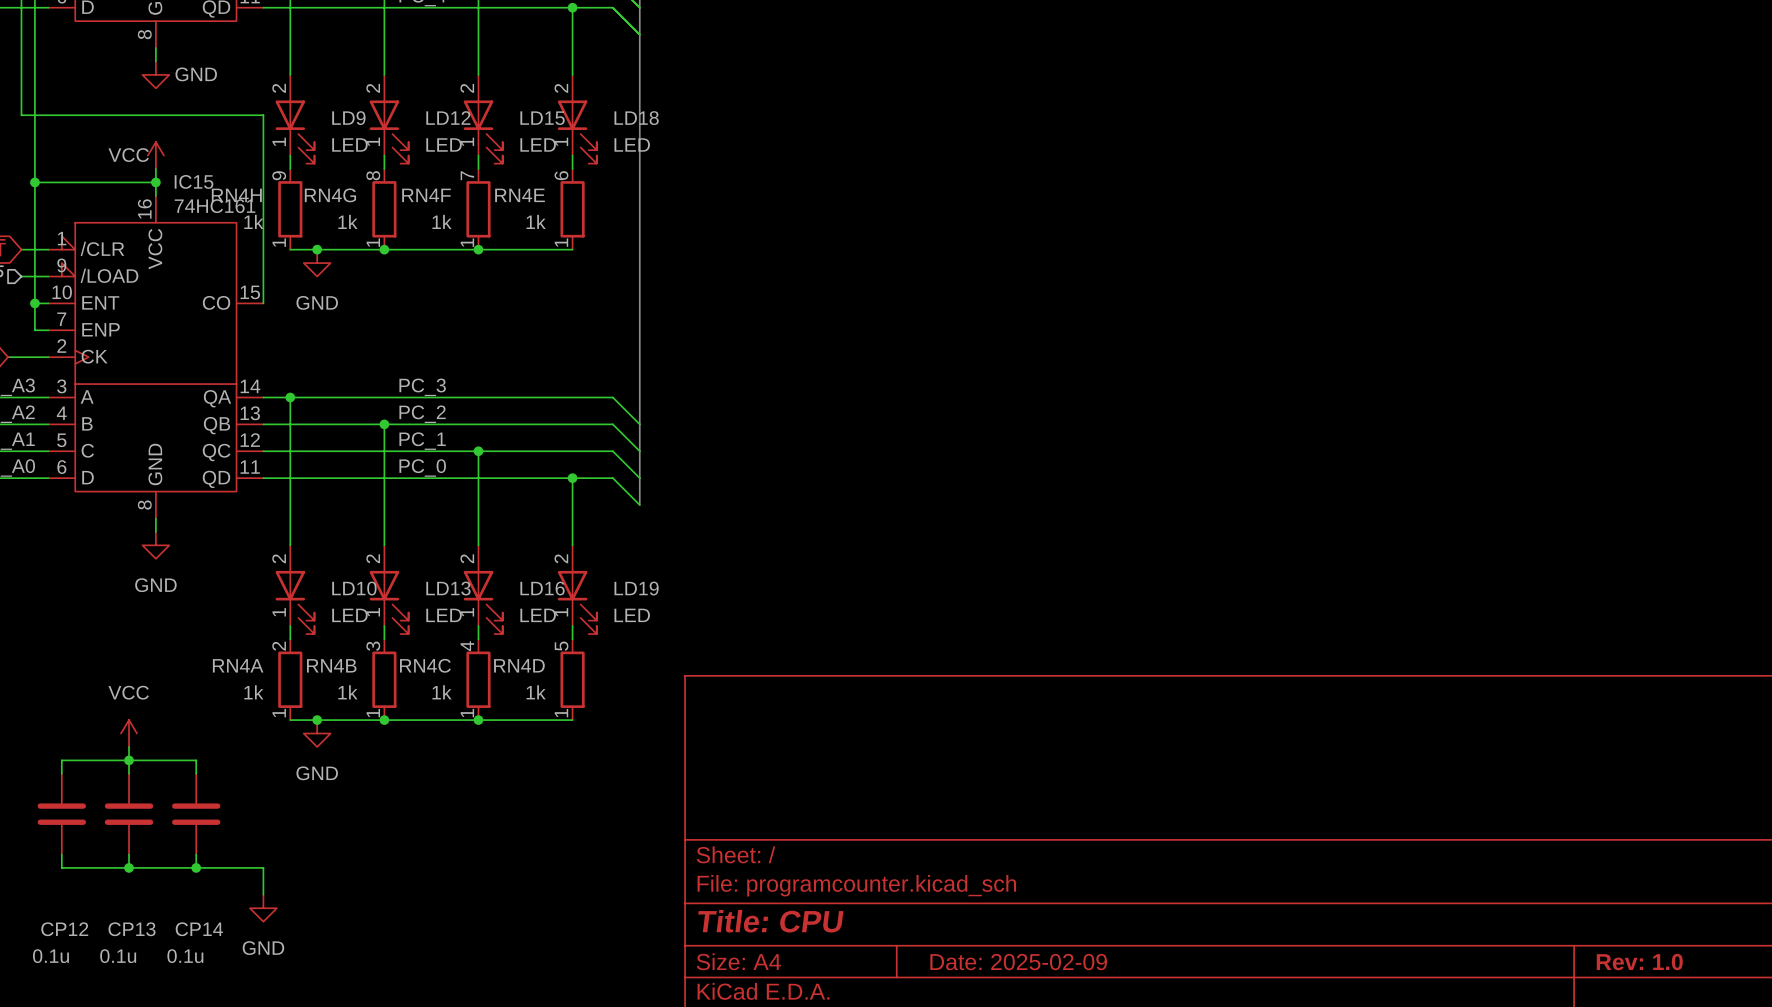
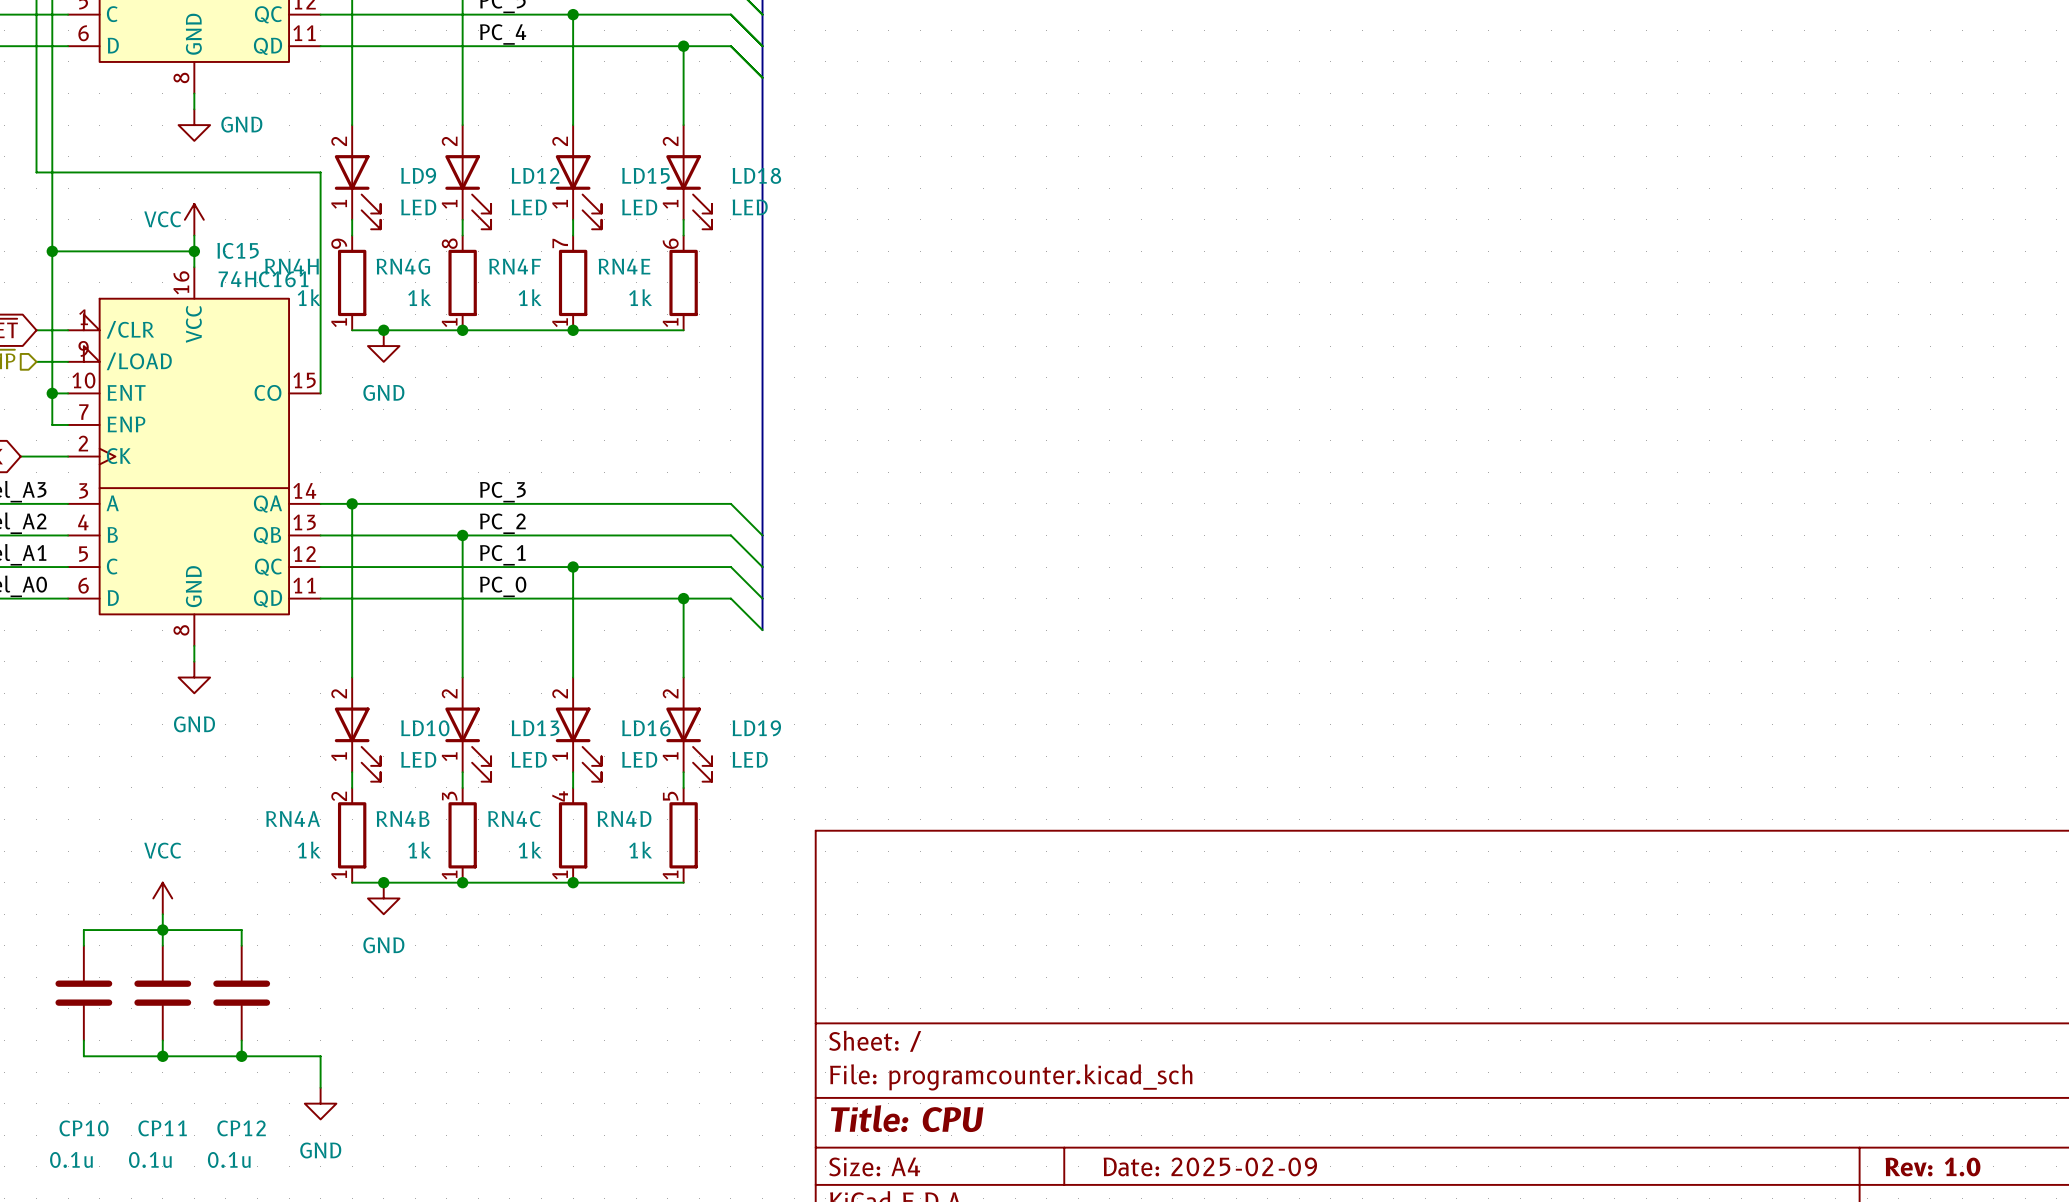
CP12 name: CP12 (64, 929) -> CP10 (84, 1128)
CP13 name: CP13 (132, 929) -> CP11 (162, 1128)
CP14 name: CP14 (199, 929) -> CP12 (241, 1128)

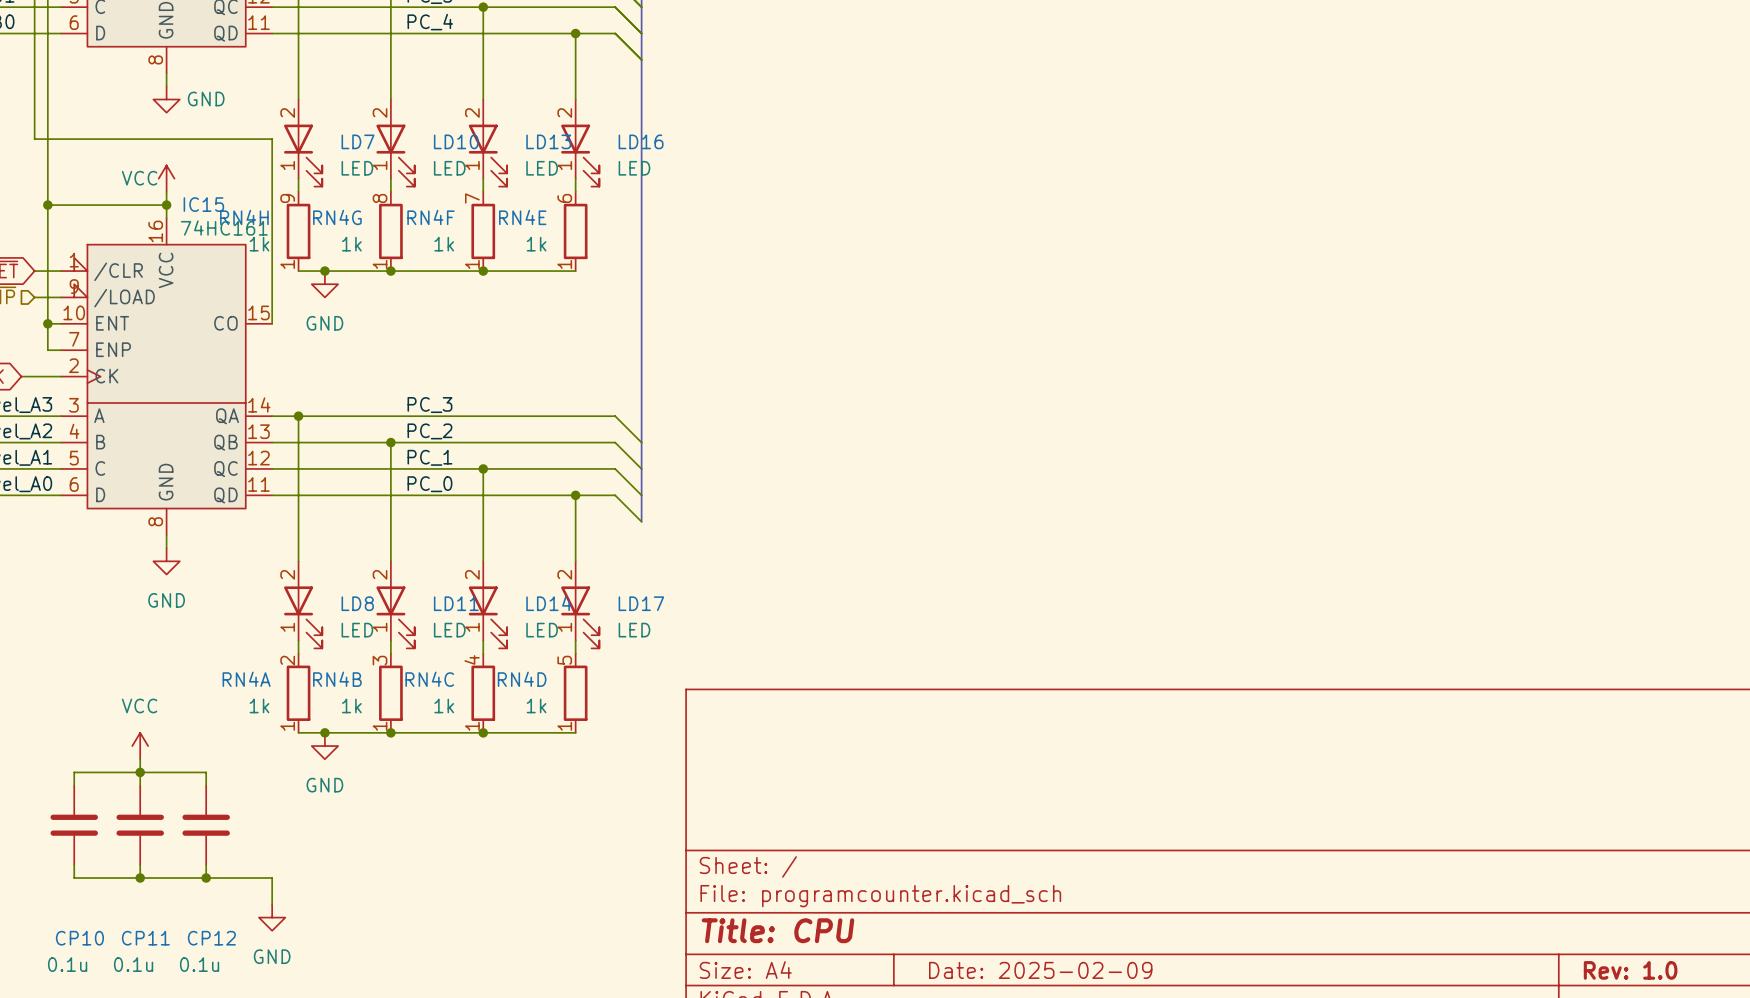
LD9 name: LD9 (418, 175) -> LD7 (358, 141)
LD12 name: LD12 (535, 175) -> LD10 (456, 141)
LD15 name: LD15 (645, 175) -> LD13 (548, 141)
LD18 name: LD18 (756, 175) -> LD16 (641, 141)
LD10 name: LD10 (425, 728) -> LD8 (357, 603)
LD13 name: LD13 (535, 728) -> LD11 (456, 603)
LD16 name: LD16 (646, 728) -> LD14 (549, 603)
LD19 name: LD19 (756, 728) -> LD17 (641, 603)

